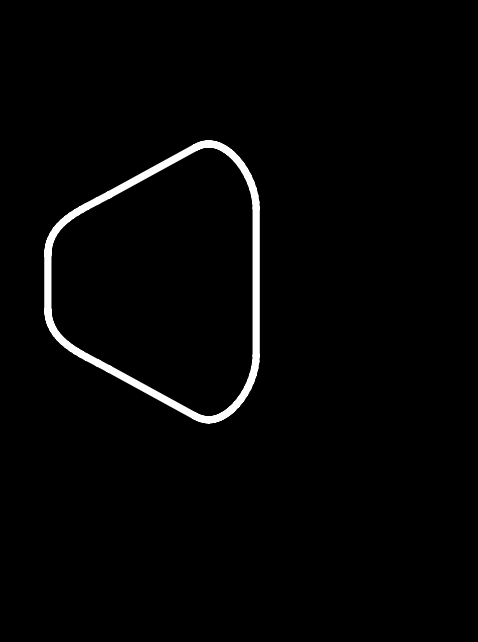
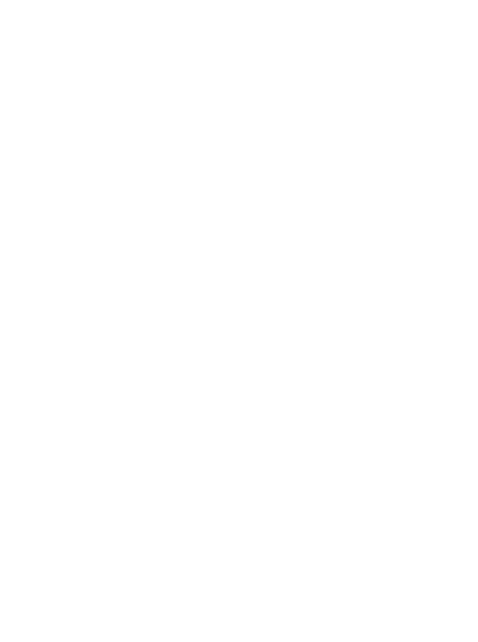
board edge: (208, 143) (195, 147) (71, 215) (53, 234) (47, 252) -> none
board edge: (209, 143) (224, 149) (240, 164) (250, 182) (255, 202) (255, 361) (250, 381) (236, 404) (227, 412) (217, 418) (206, 419) (195, 416) (71, 348) (53, 329) (47, 311) -> none
board edge: (47, 252) (47, 309) -> none

